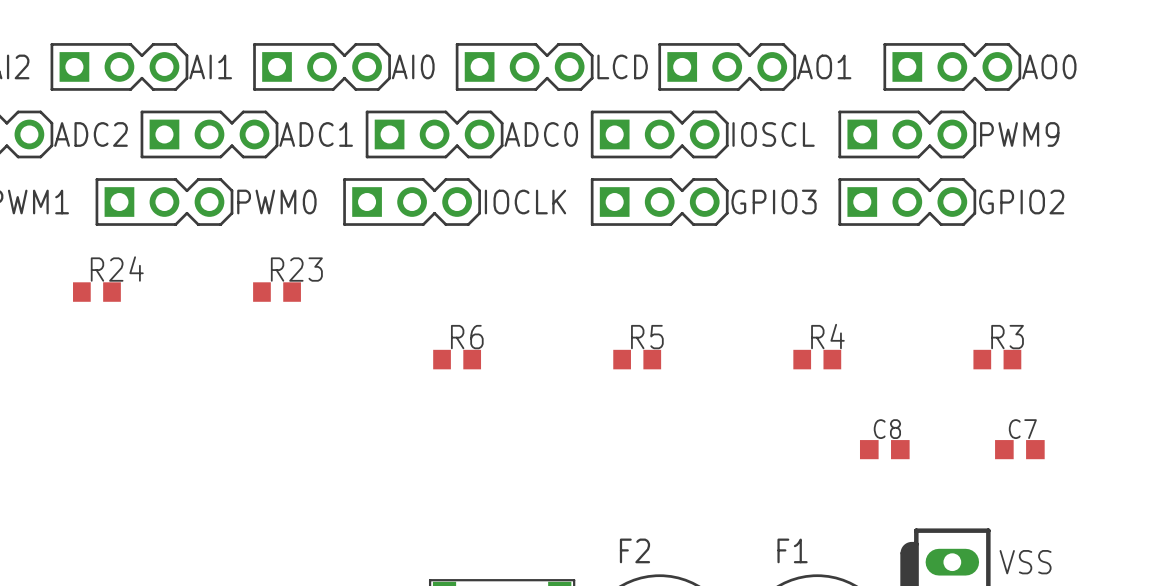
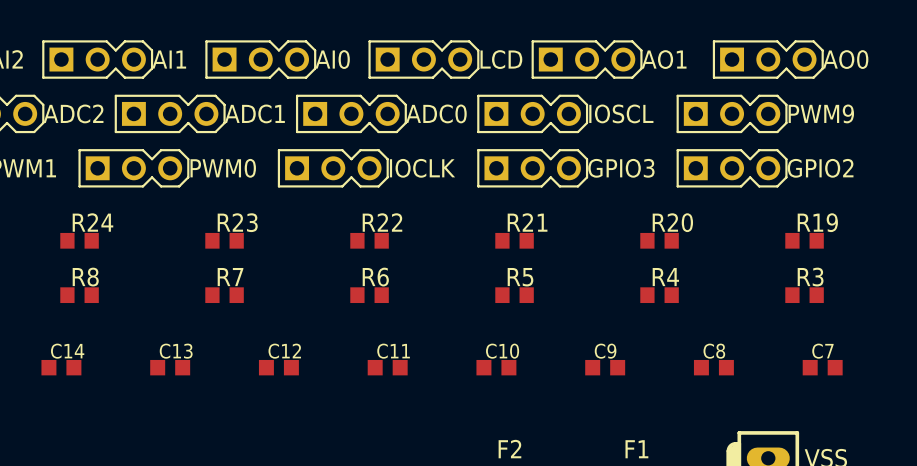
R22: none -> (369, 240)
R21: none -> (514, 240)
R20: none -> (659, 240)
R19: none -> (804, 240)
R8: none -> (79, 295)
R7: none -> (224, 295)
C14: none -> (61, 367)
C13: none -> (170, 367)
C12: none -> (278, 367)
C11: none -> (387, 367)
C10: none -> (496, 367)
C9: none -> (605, 367)

